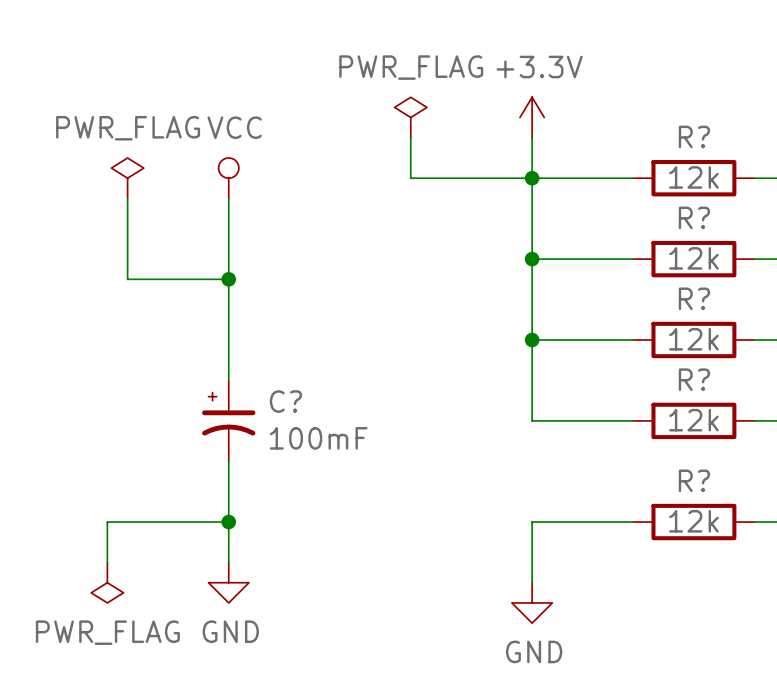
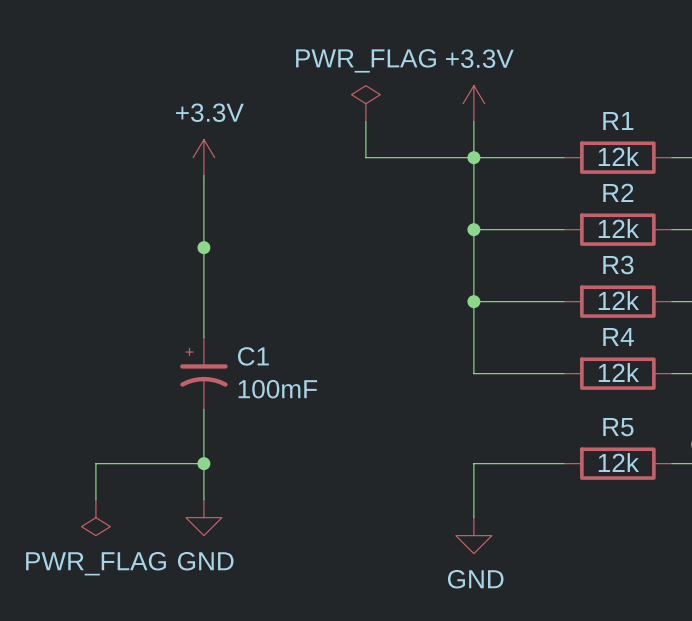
R? name: R? (694, 136) -> R1 (618, 121)
power symbol: PWR_FLAG (127, 178) -> none
power symbol: VCC (228, 178) -> +3.3V (203, 157)
wire: (127, 198) (127, 279) (228, 279) -> none
R? name: R? (694, 217) -> R2 (618, 192)
R? name: R? (694, 298) -> R3 (618, 264)
R? name: R? (694, 379) -> R4 (618, 336)
C? name: C? (285, 401) -> C1 (253, 356)
R? name: R? (694, 480) -> R5 (618, 427)

